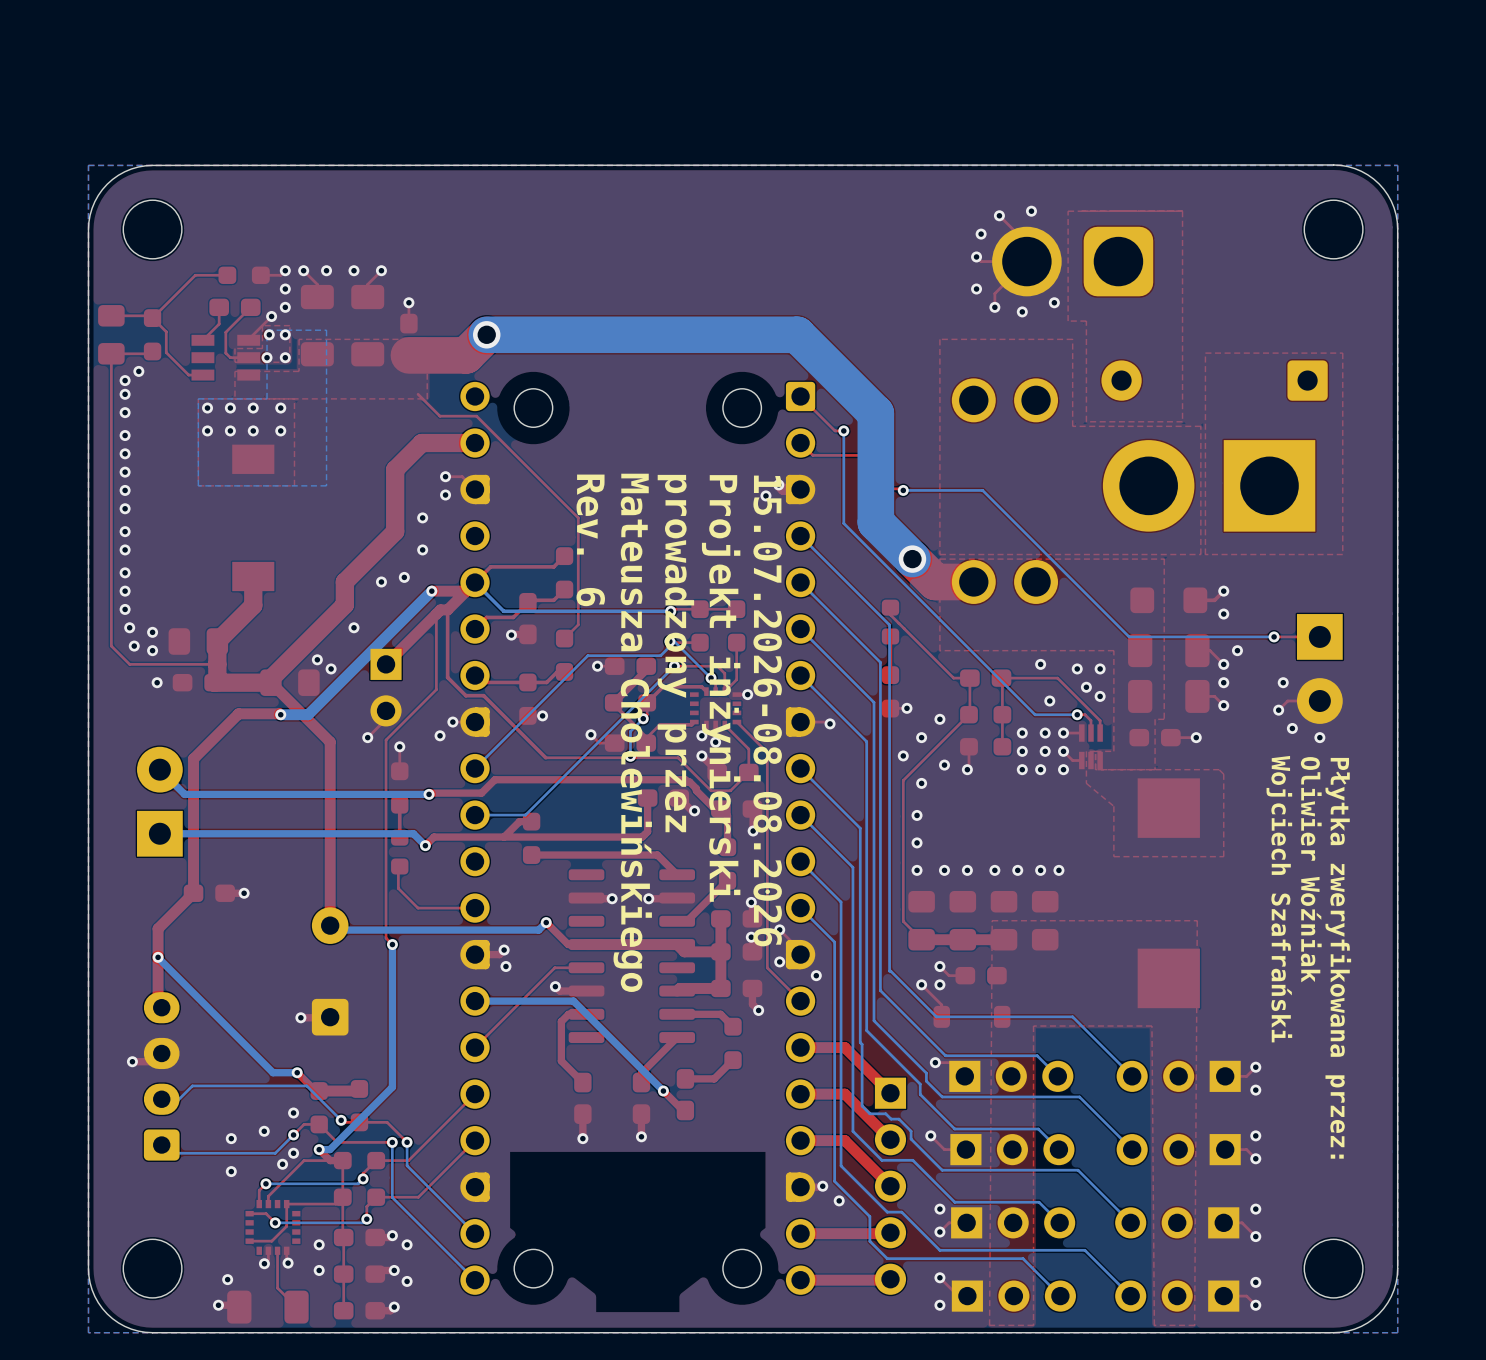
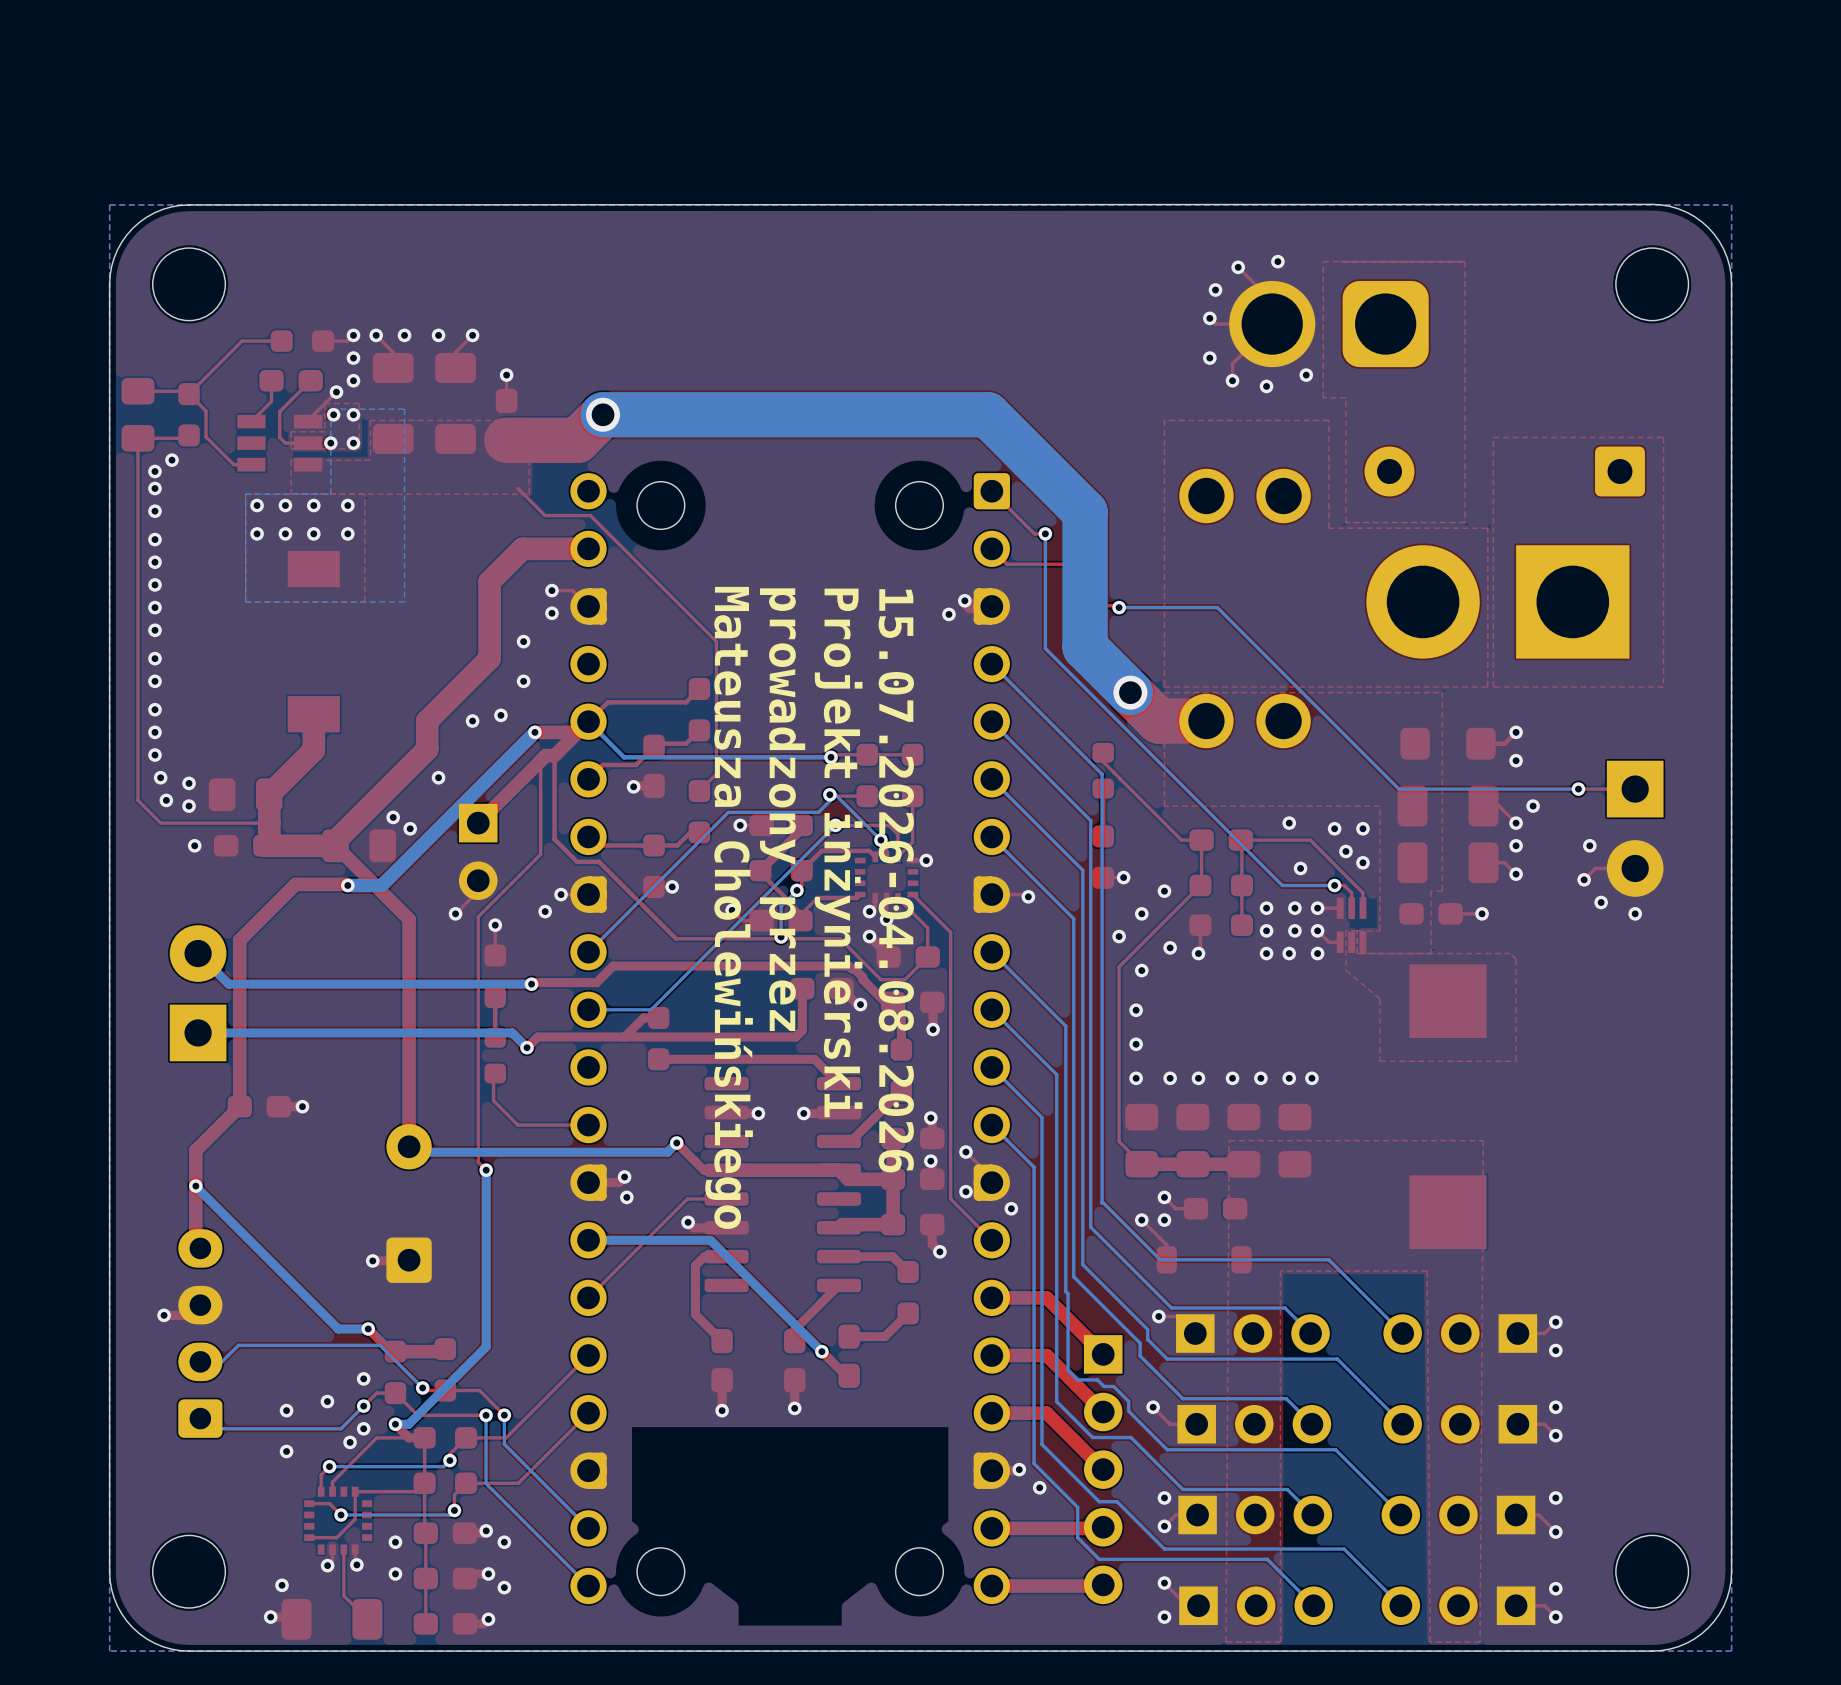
text: Rev. 6 (590, 540) -> Mateusza Cholewińskiego (729, 907)
text: prowadzony przez (675, 653) -> Projekt inżynierski (838, 852)
text: Projekt inżynierski (721, 688) -> 15.07.2026-04.08.2026 (896, 880)
text: 15.07.2026-08.08.2026 (767, 710) -> none
text: Mateusza Cholewińskiego (632, 732) -> prowadzony przez (782, 809)
text: Oliwier Woźniak (1311, 869) -> none
text: Wojciech Szafrański (1279, 899) -> none
text: Płytka zweryfikowana przez: (1338, 958) -> none

